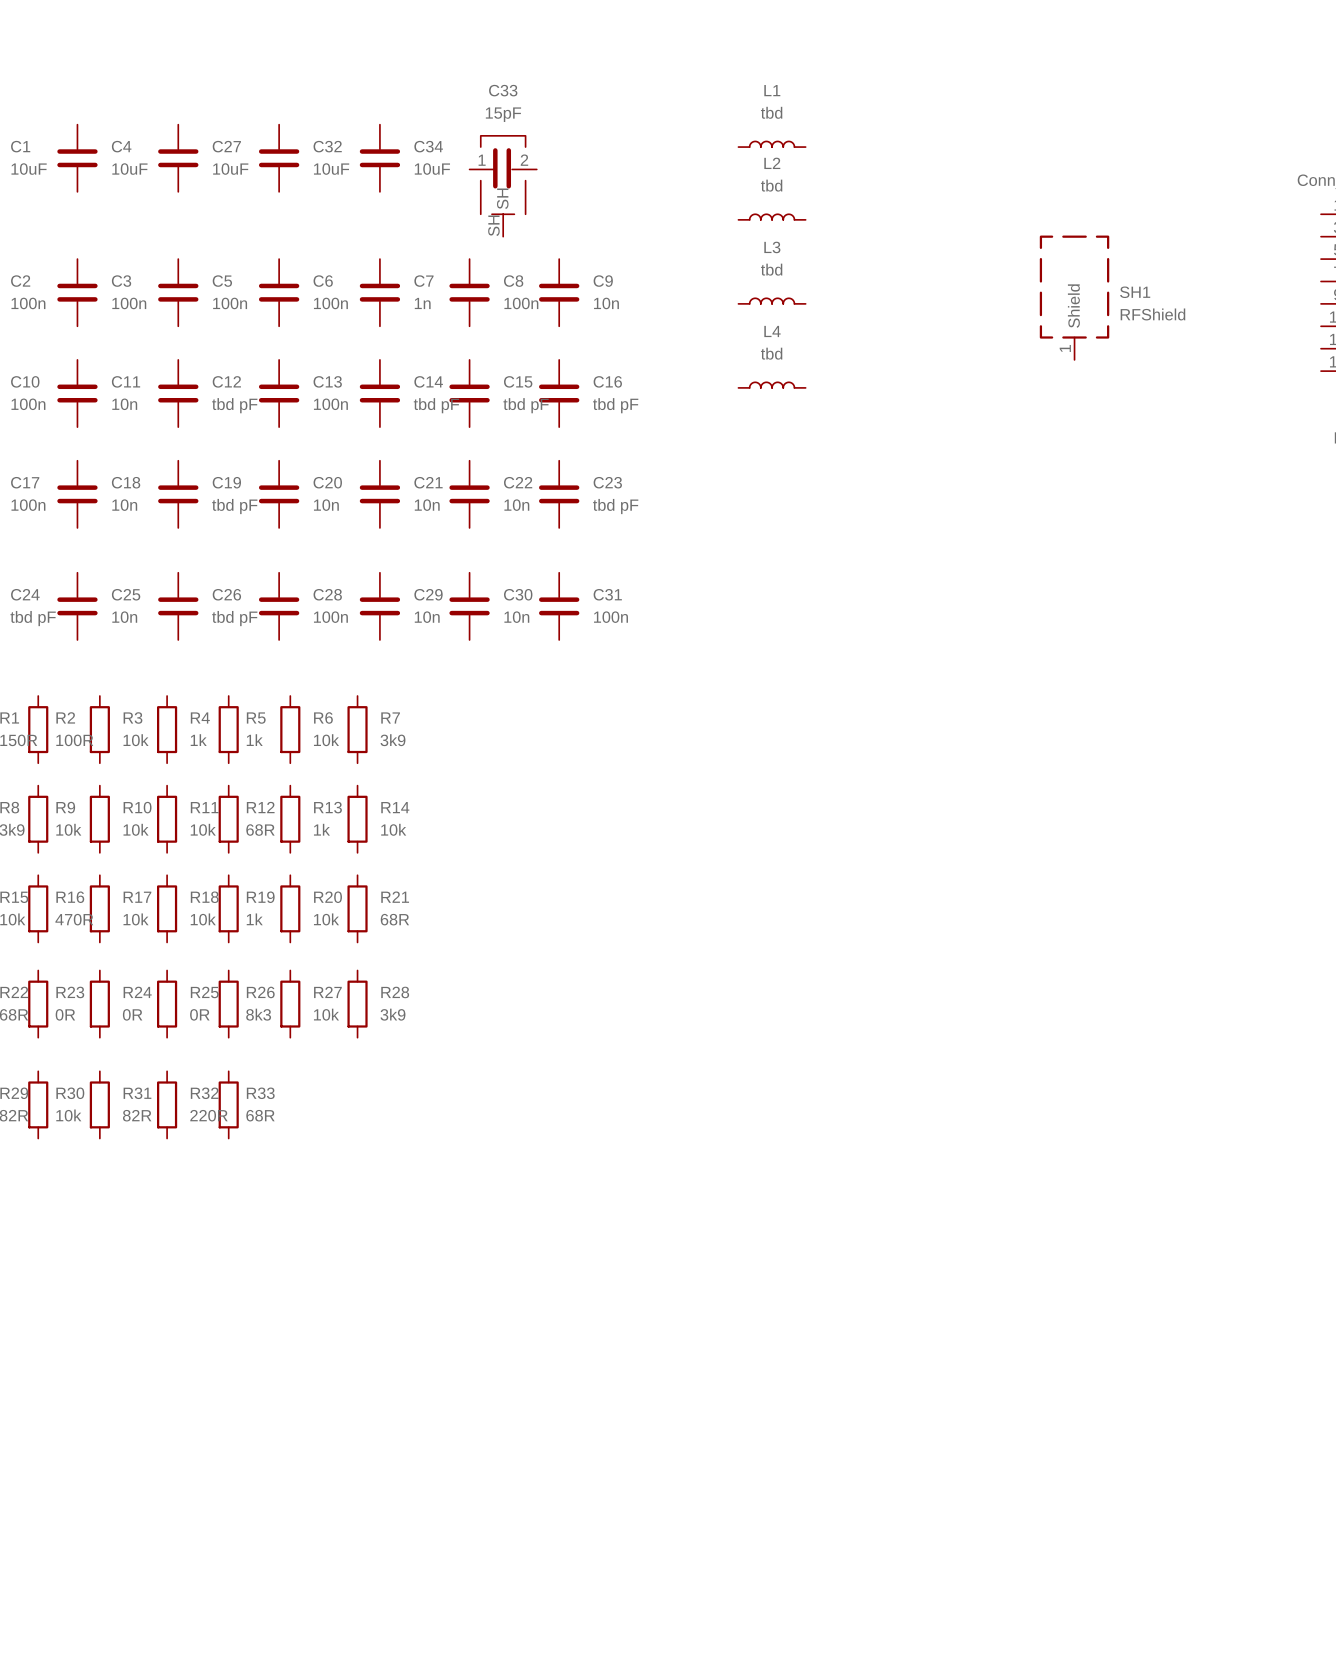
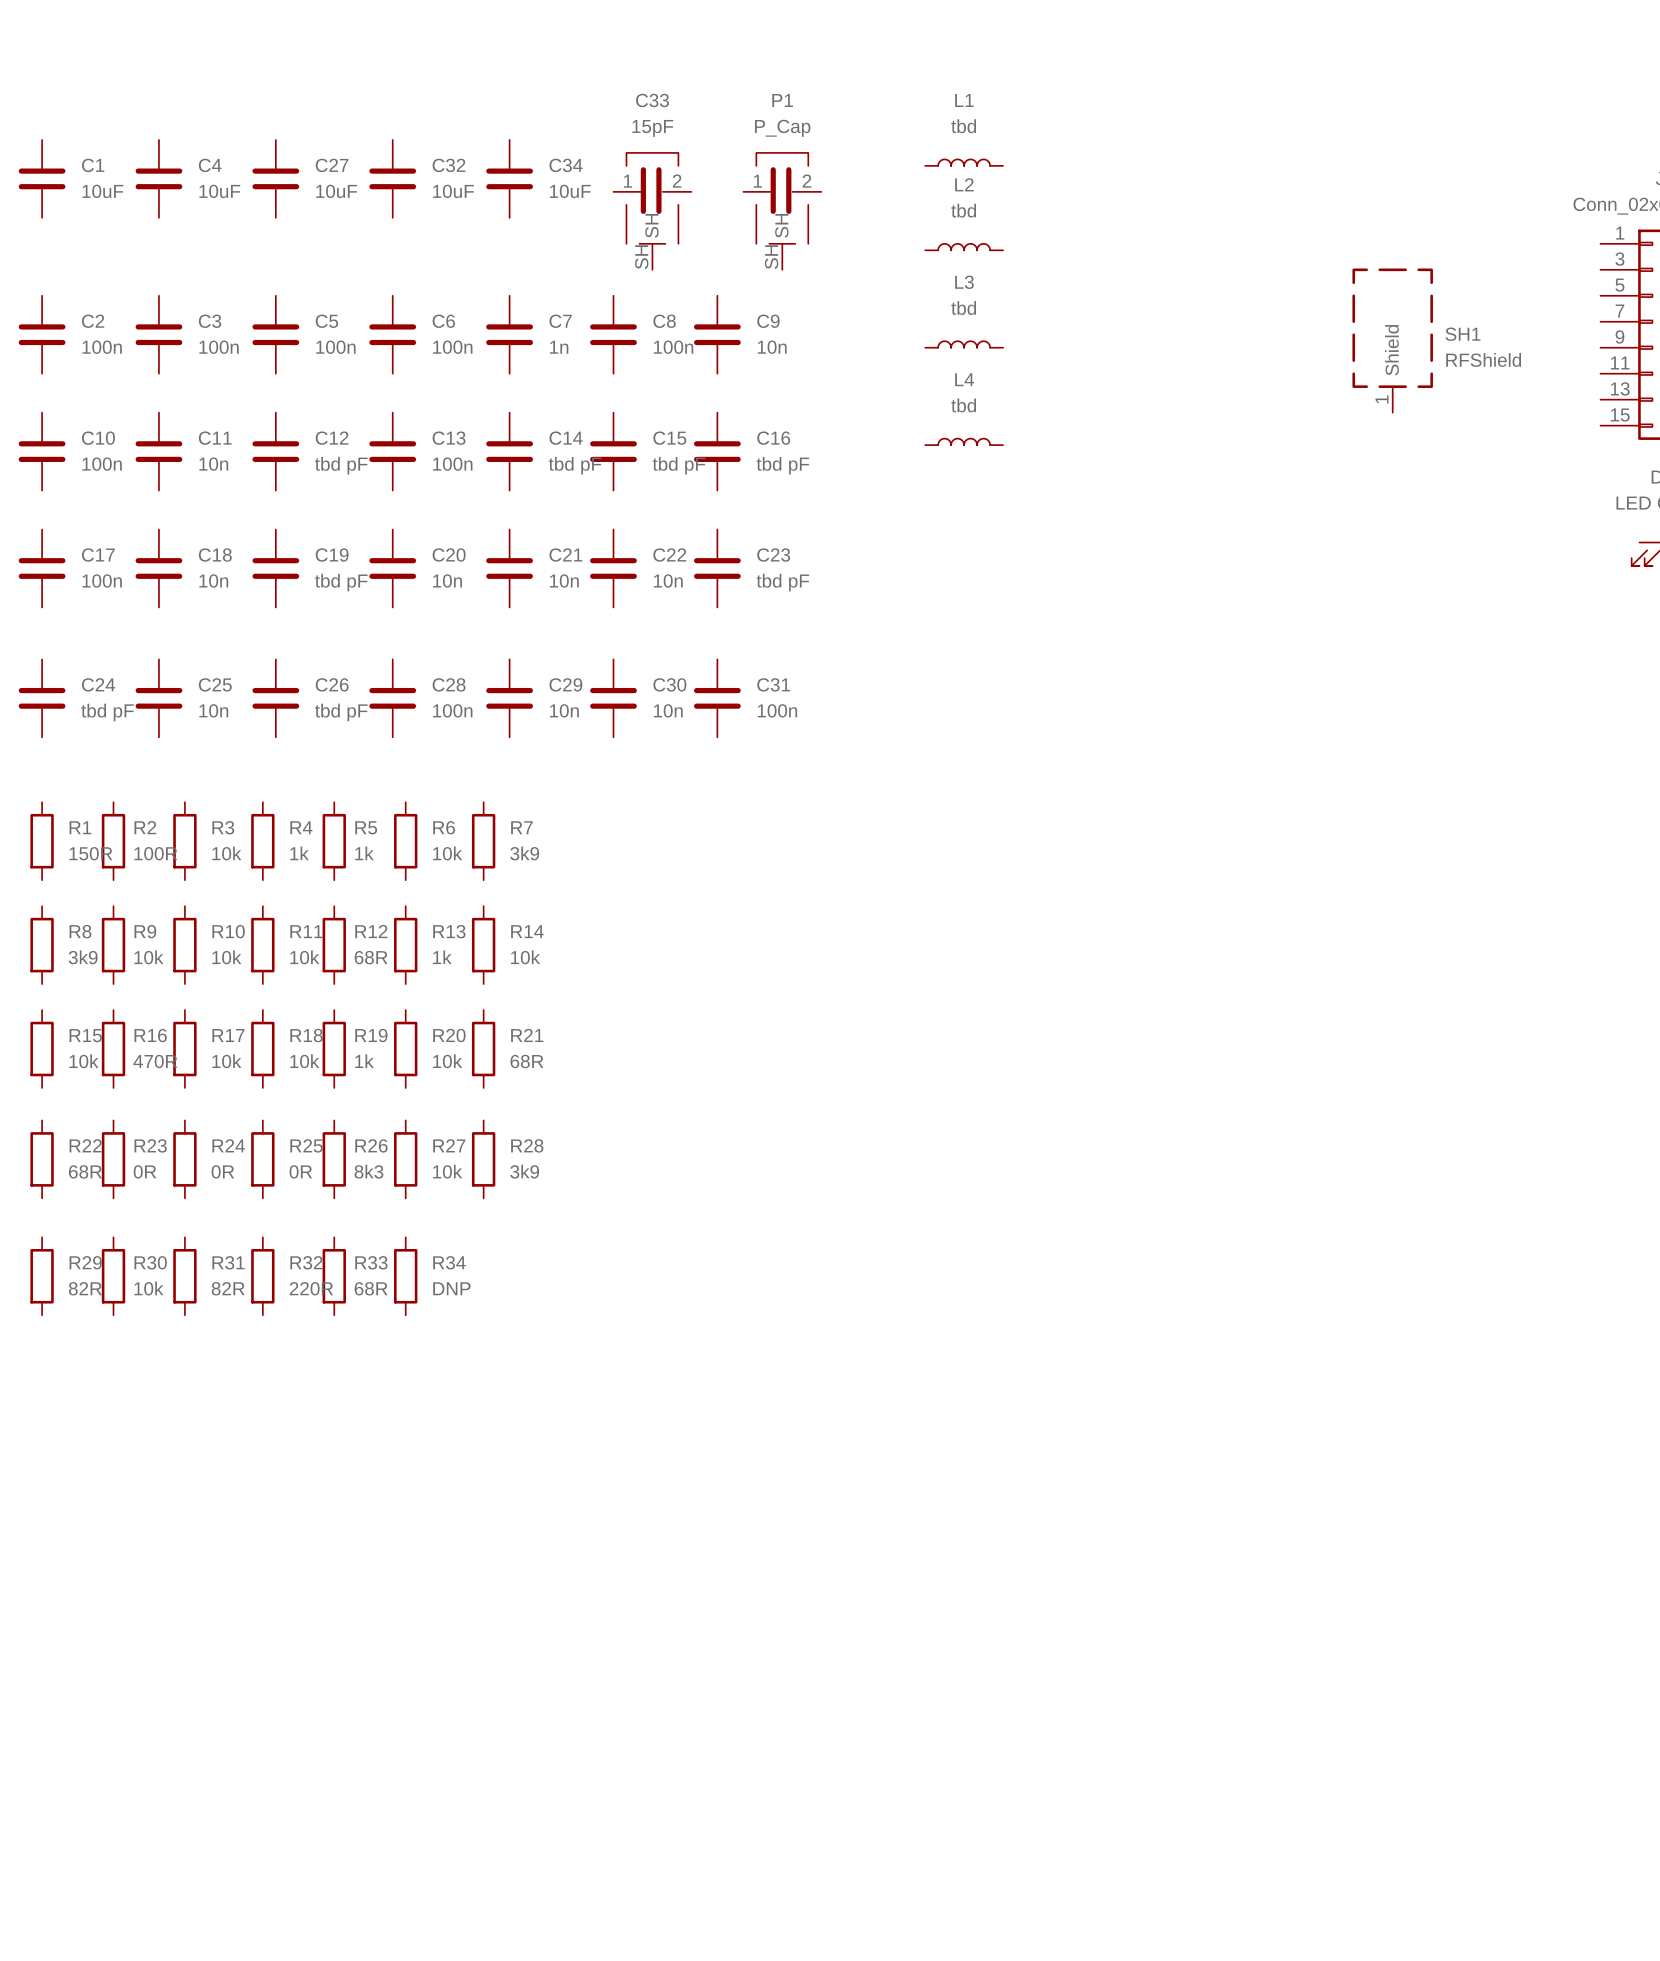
P1: none -> P_Cap (782, 211)
SH1 position: (1074, 297) -> (1392, 340)
R34: none -> DNP (405, 1276)

